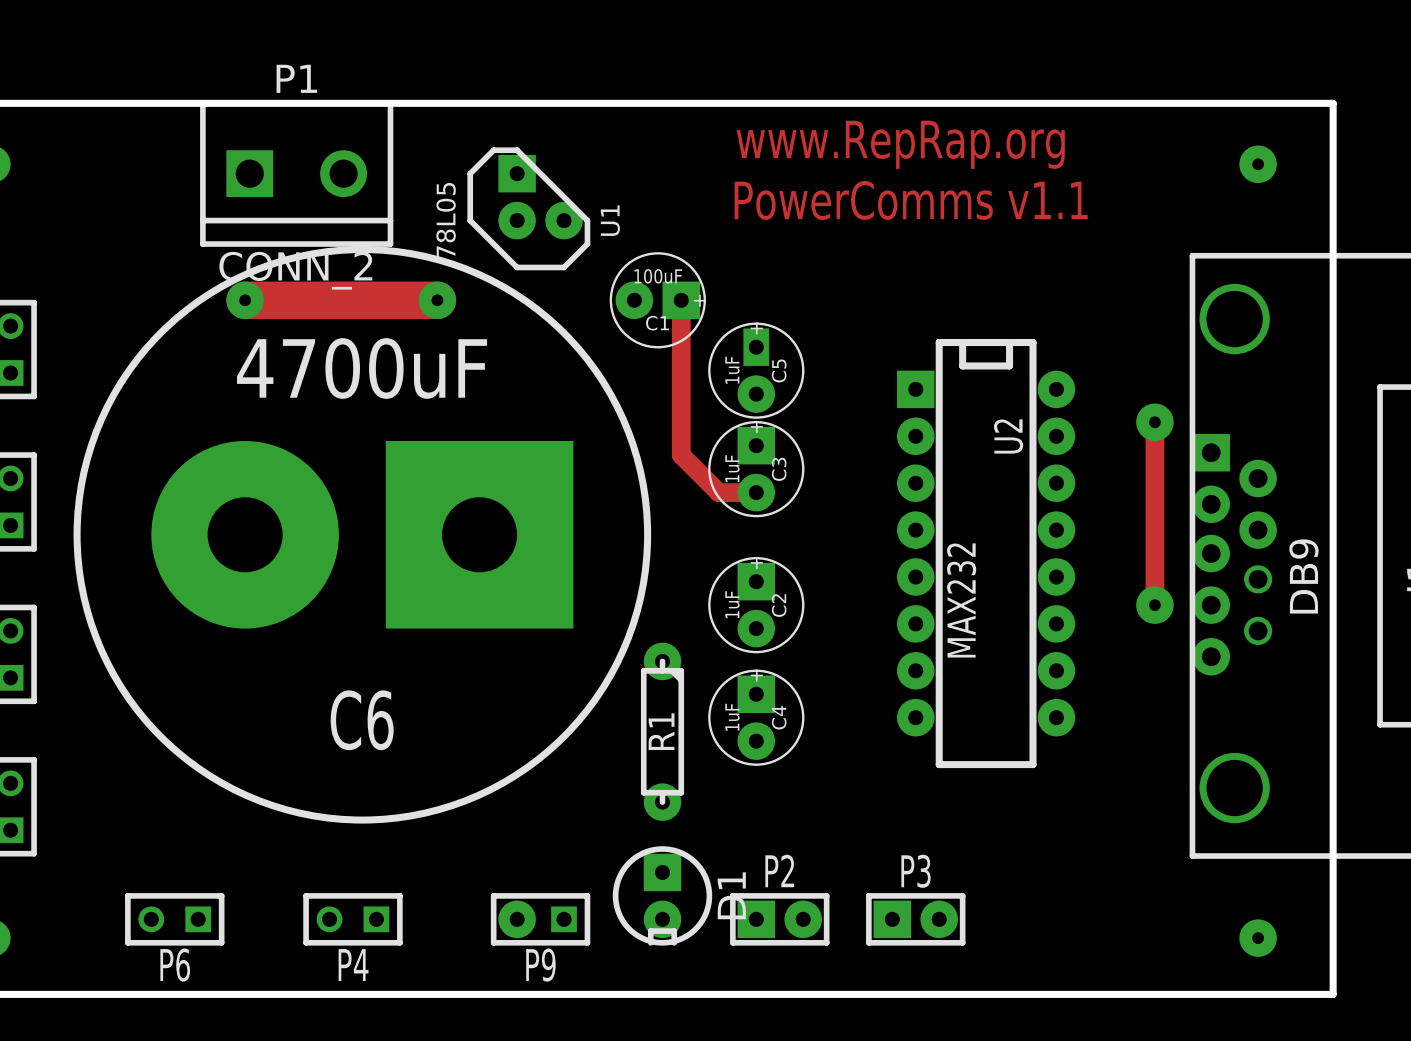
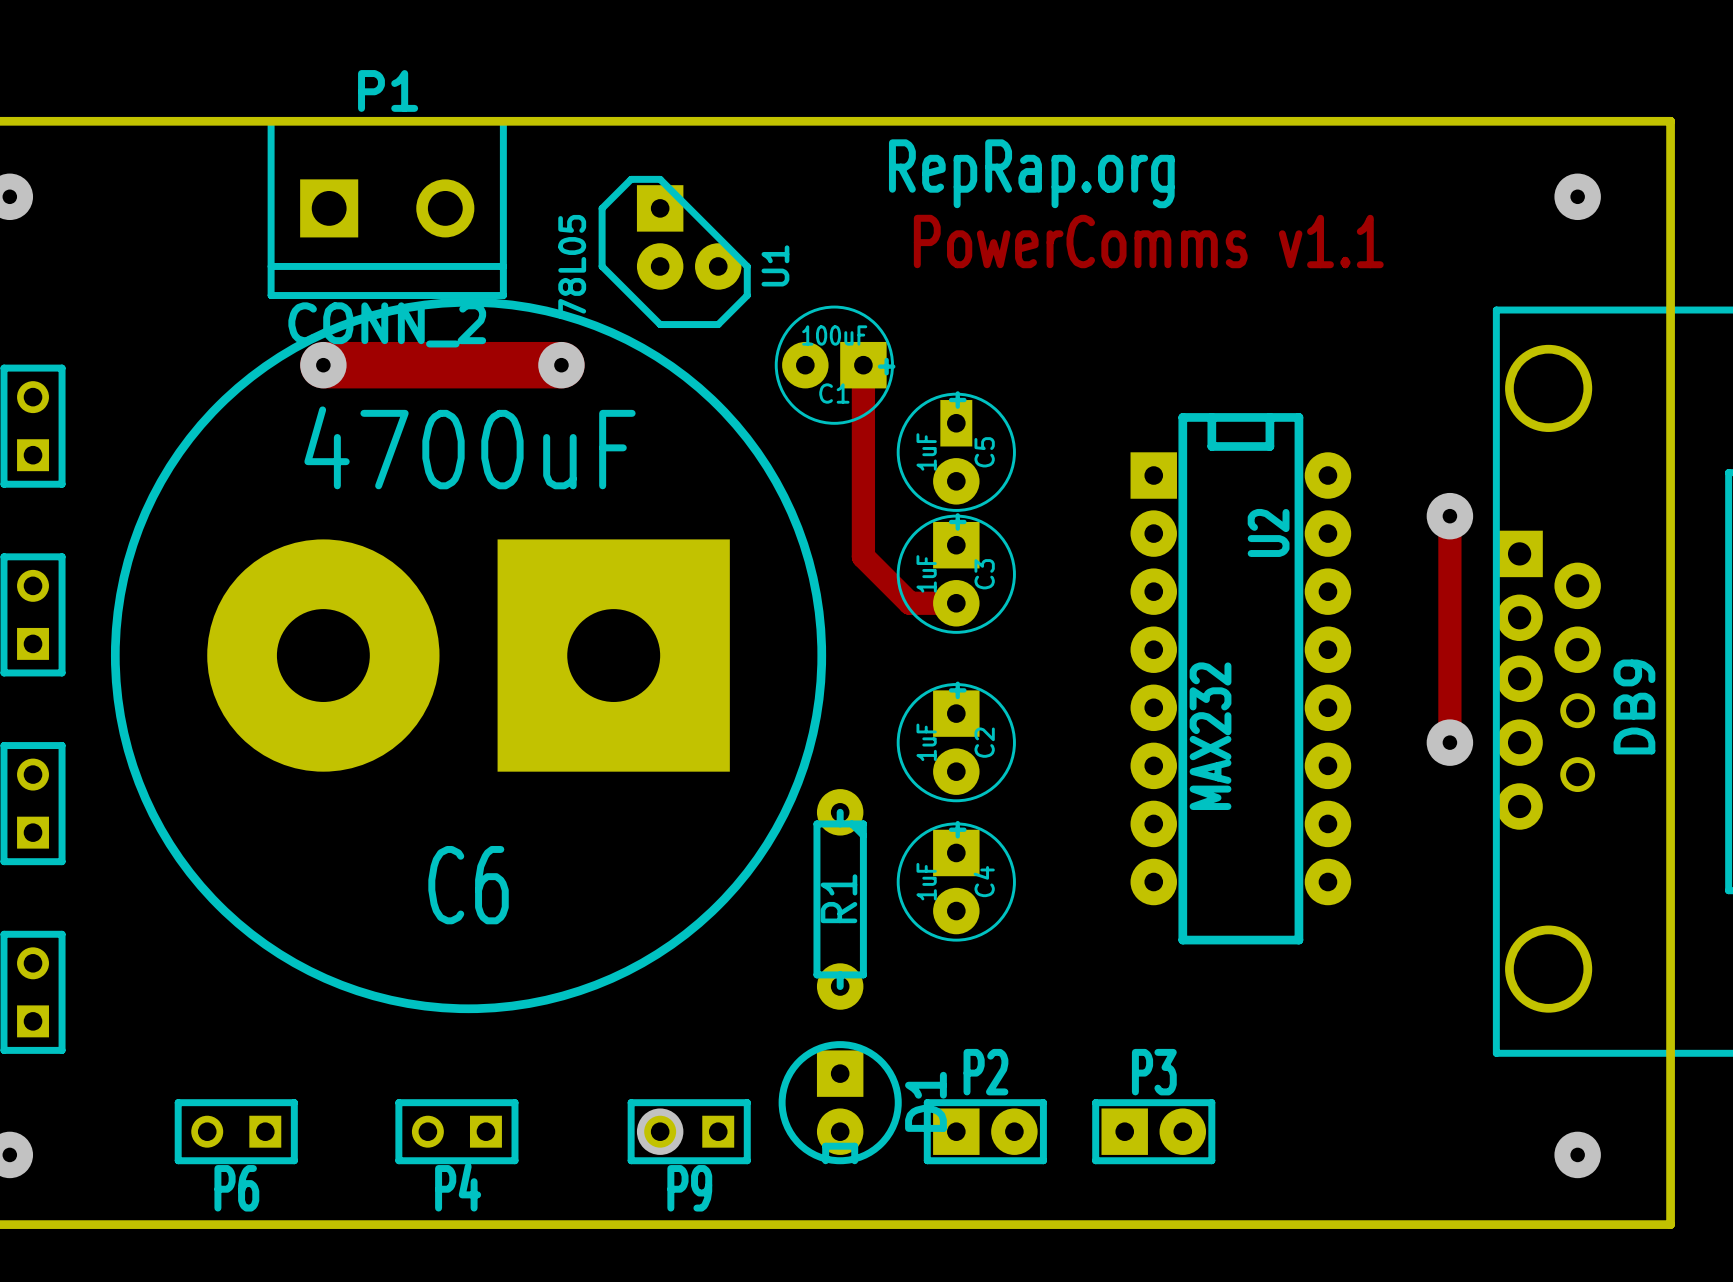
text: www.RepRap.org (900, 144) -> RepRap.org (1031, 173)

